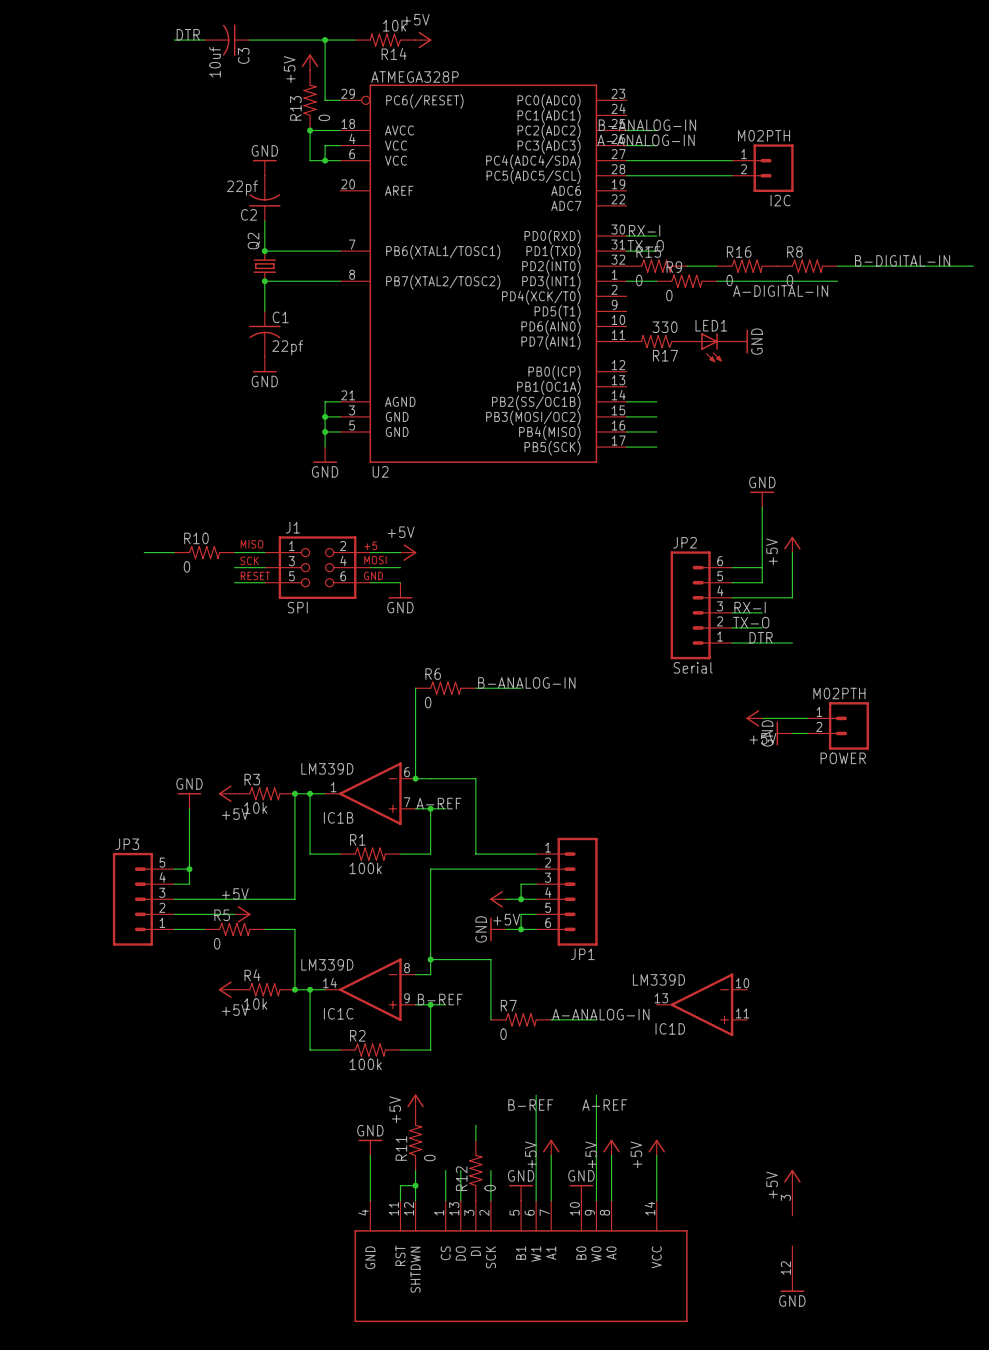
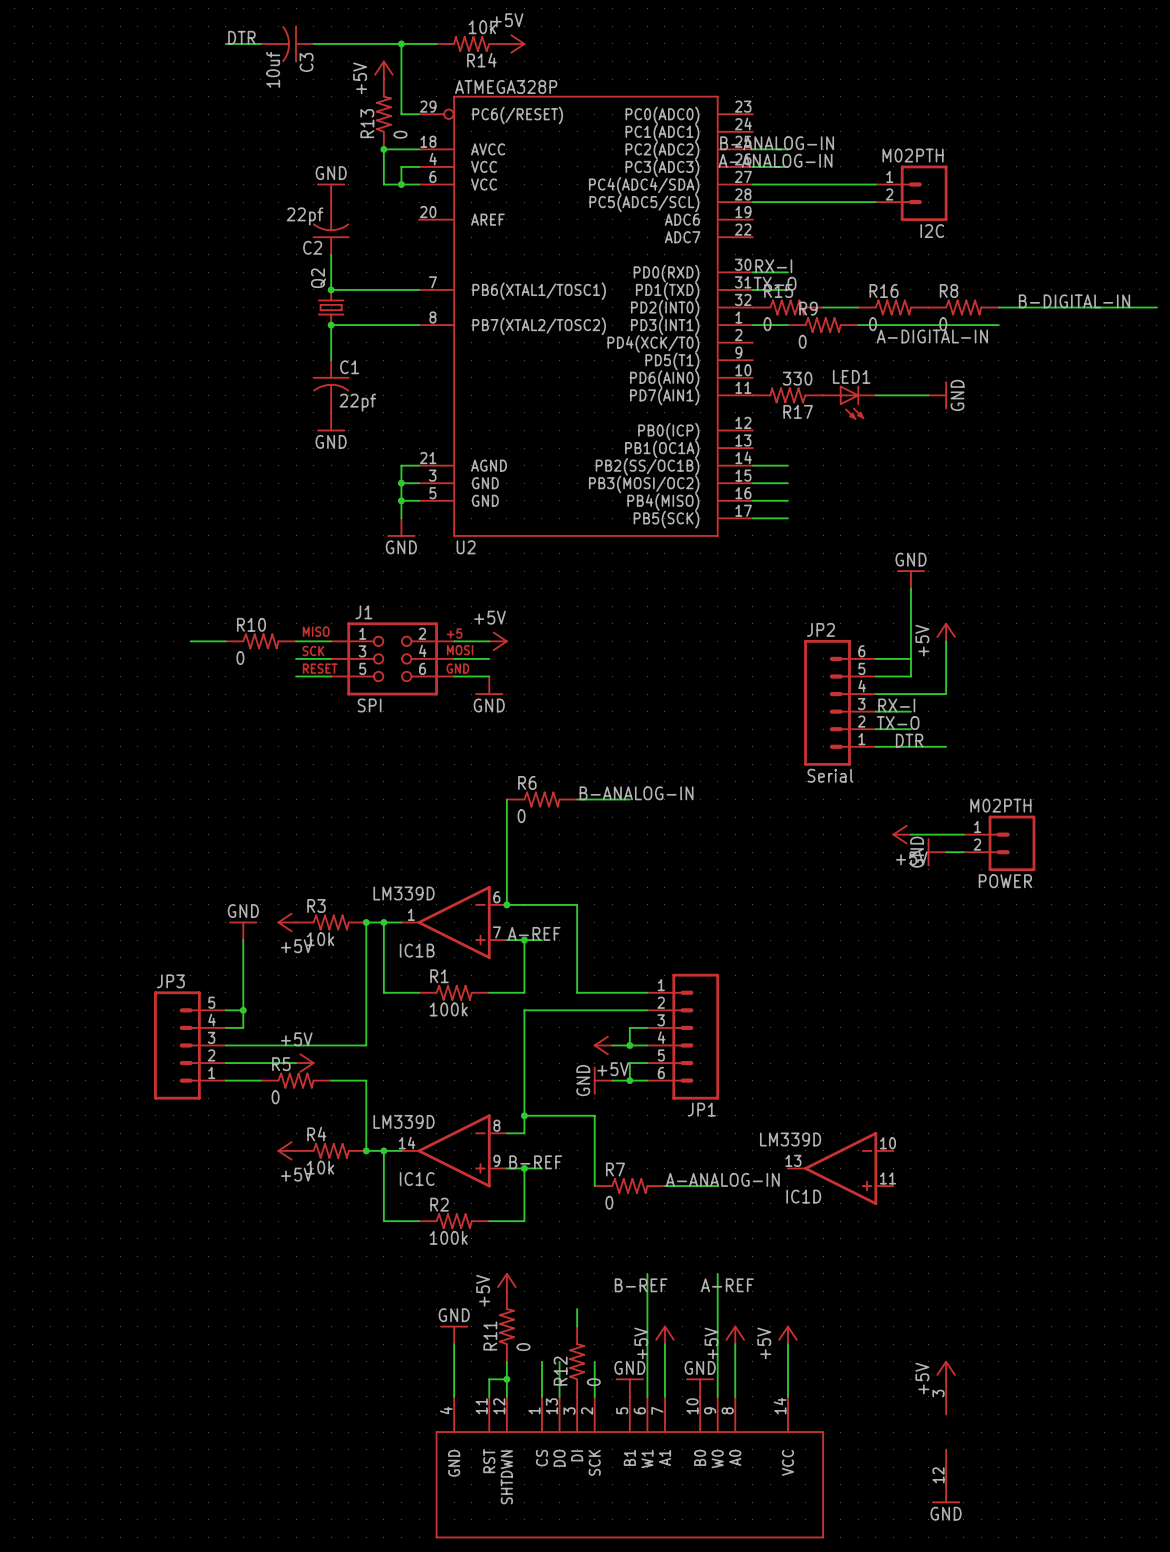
wire: none -> (875, 395) (928, 395)
power symbol position: GND (740, 341) -> GND (937, 395)

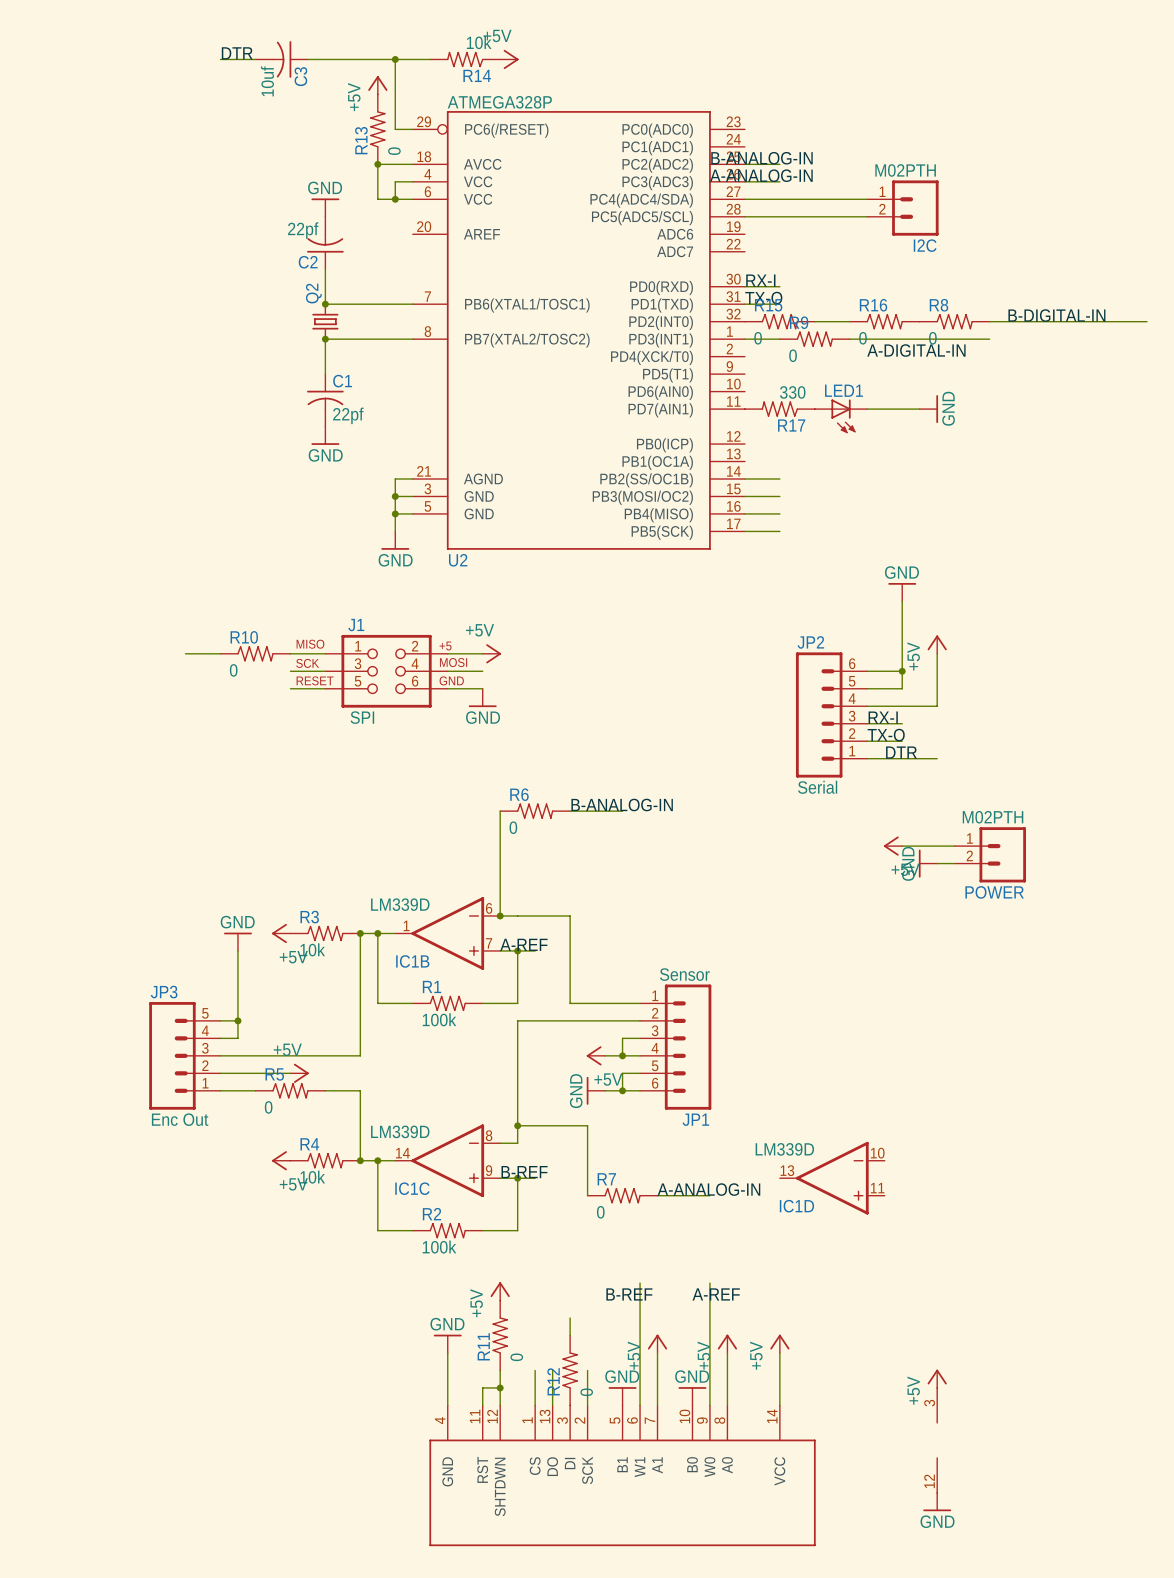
junction: none -> (902, 671)
JP1 value: none -> Sensor (684, 974)
JP3 value: none -> Enc Out (180, 1119)

